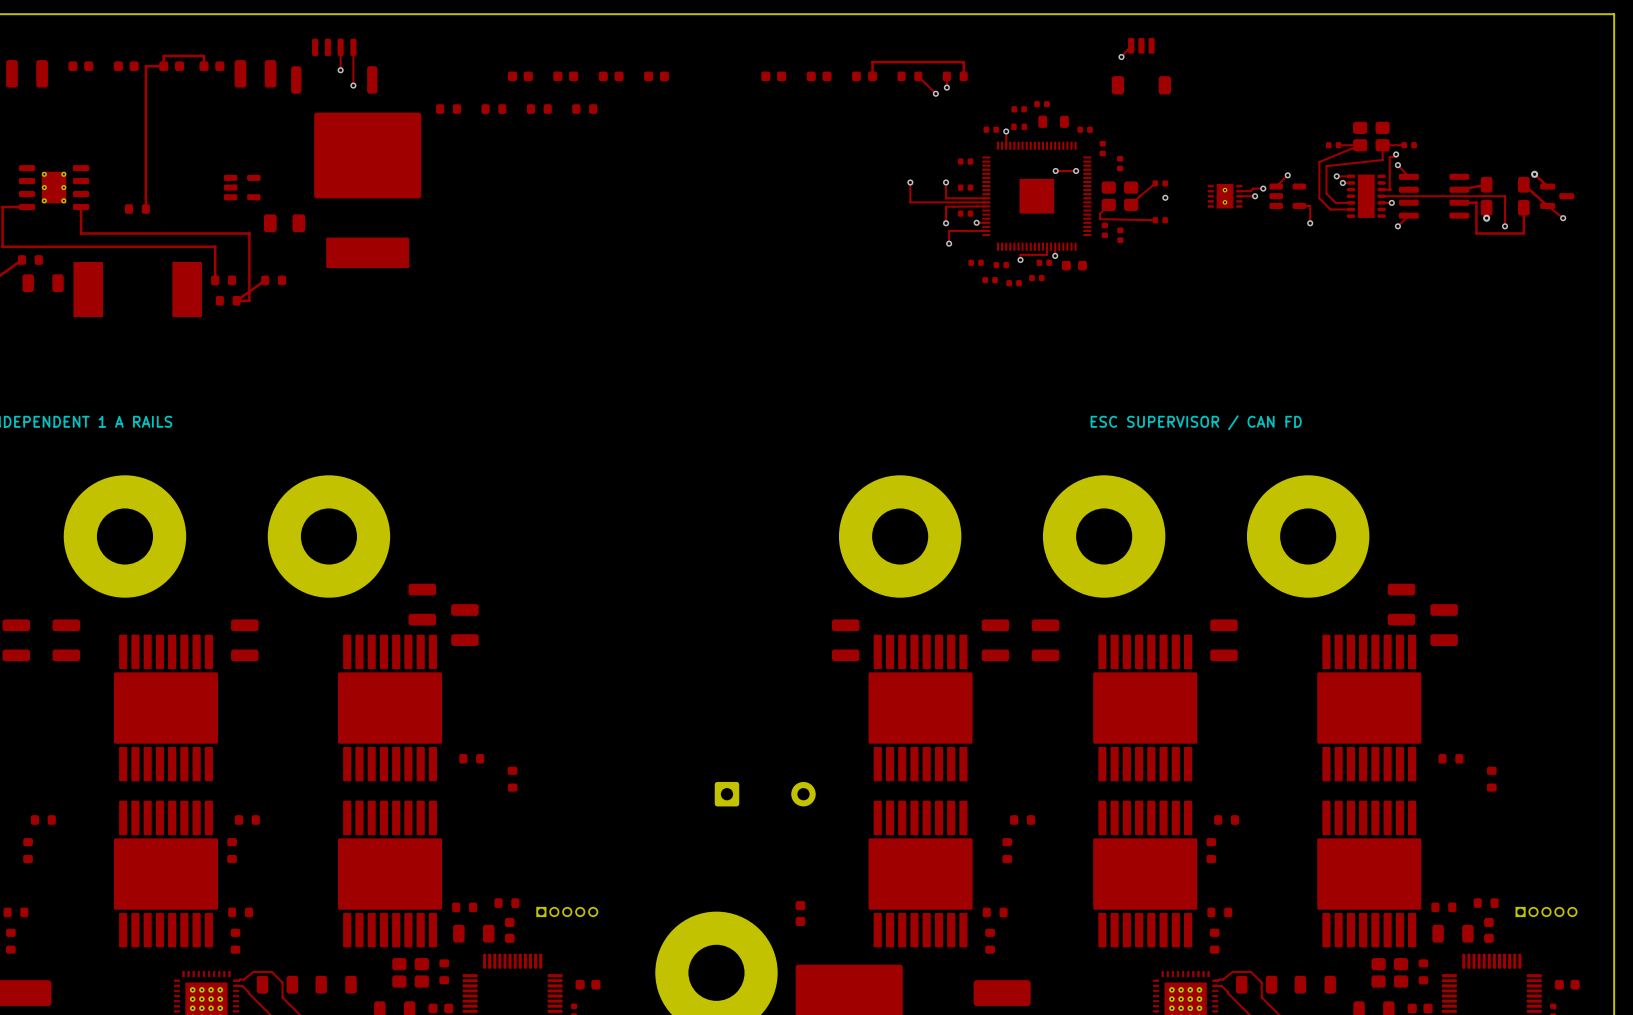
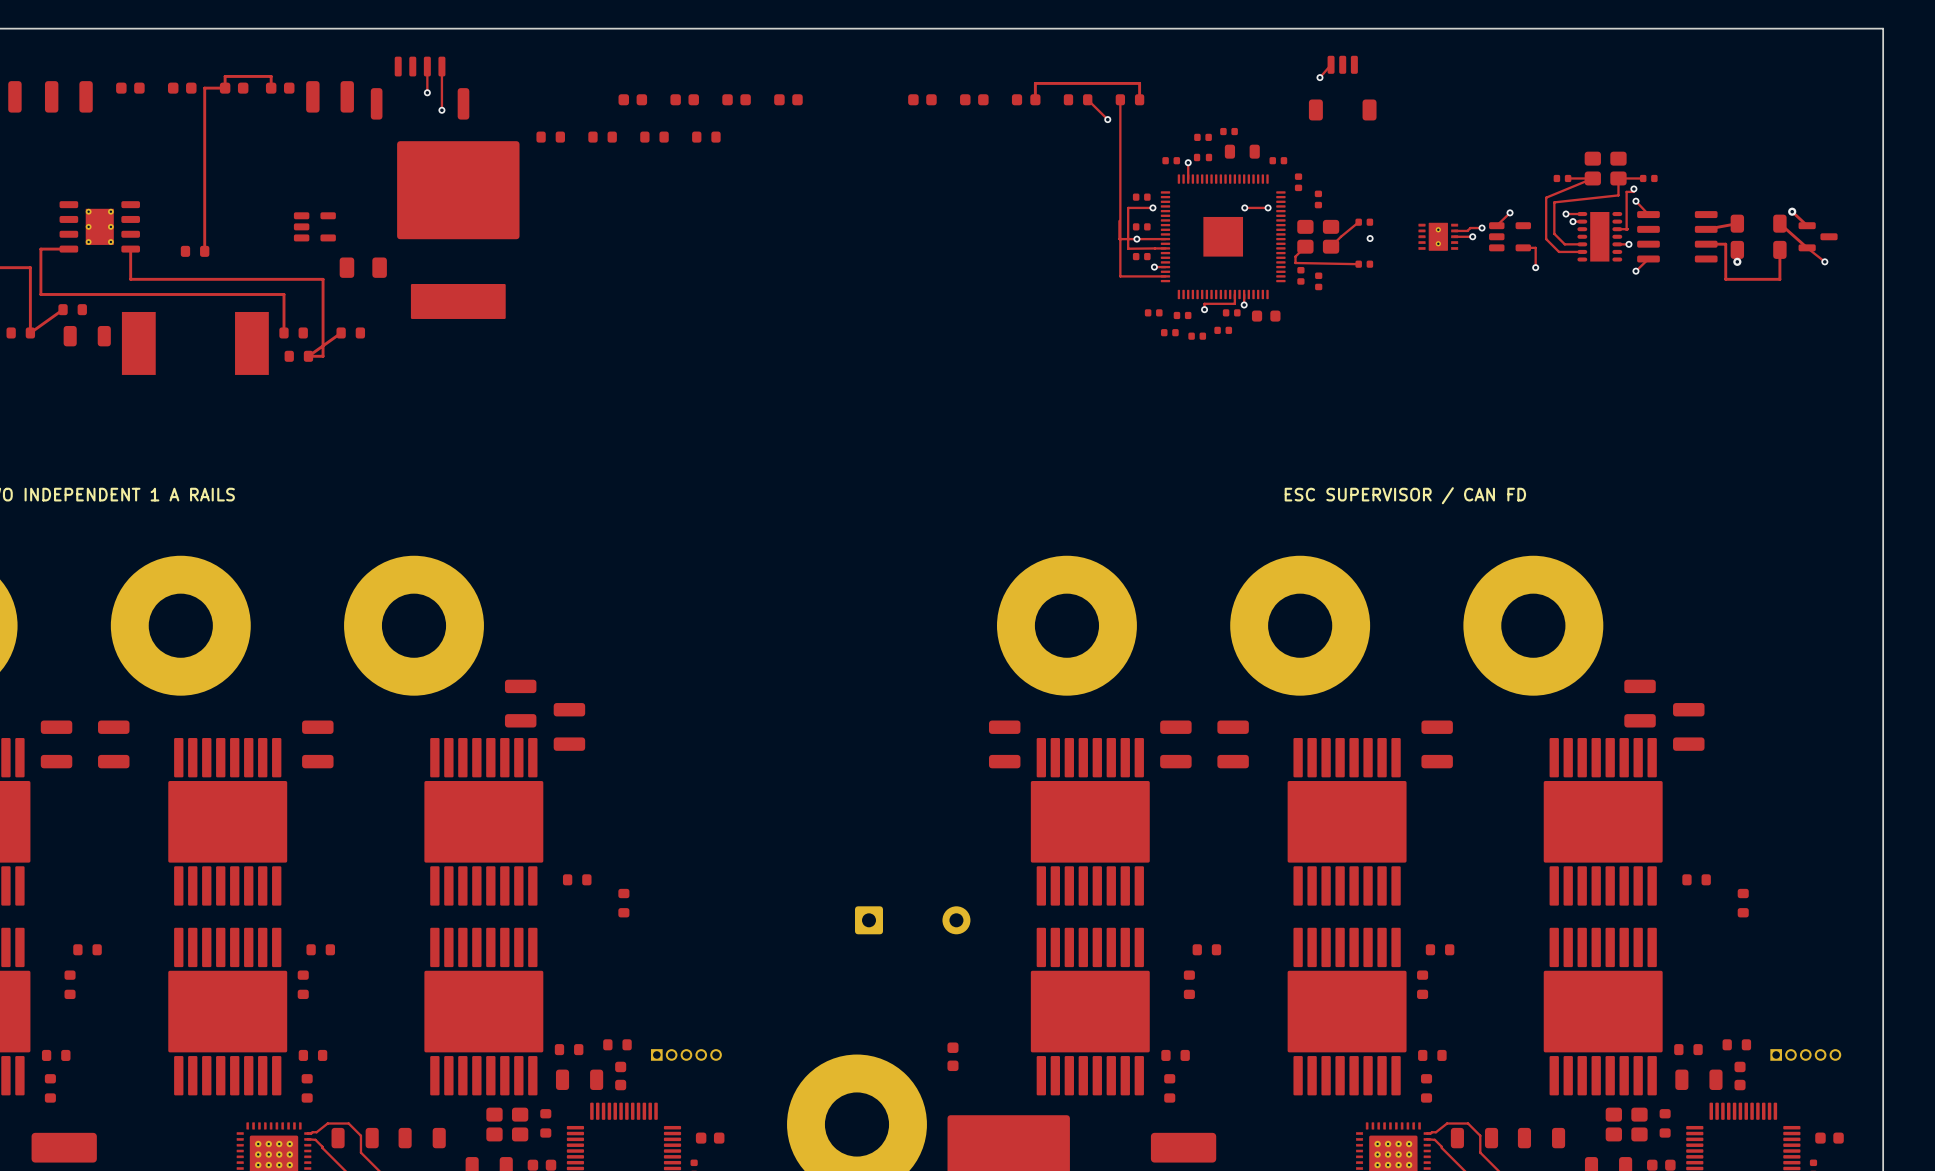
via: (946, 87) -> none
via: none -> (1152, 207)
track: (910, 182) (910, 202) (986, 202) -> none
via: (910, 182) -> none
via: (946, 182) -> none
track: (1381, 196) (1505, 196) (1505, 226) -> none
via: none -> (1136, 239)
track: (953, 206) (946, 206) (946, 223) -> (1128, 248) (1128, 207) (1152, 207)
via: (946, 223) -> none
via: (1505, 226) -> none
track: (949, 230) (949, 243) -> (1122, 276) (1120, 276) (1120, 112)
via: (949, 243) -> none

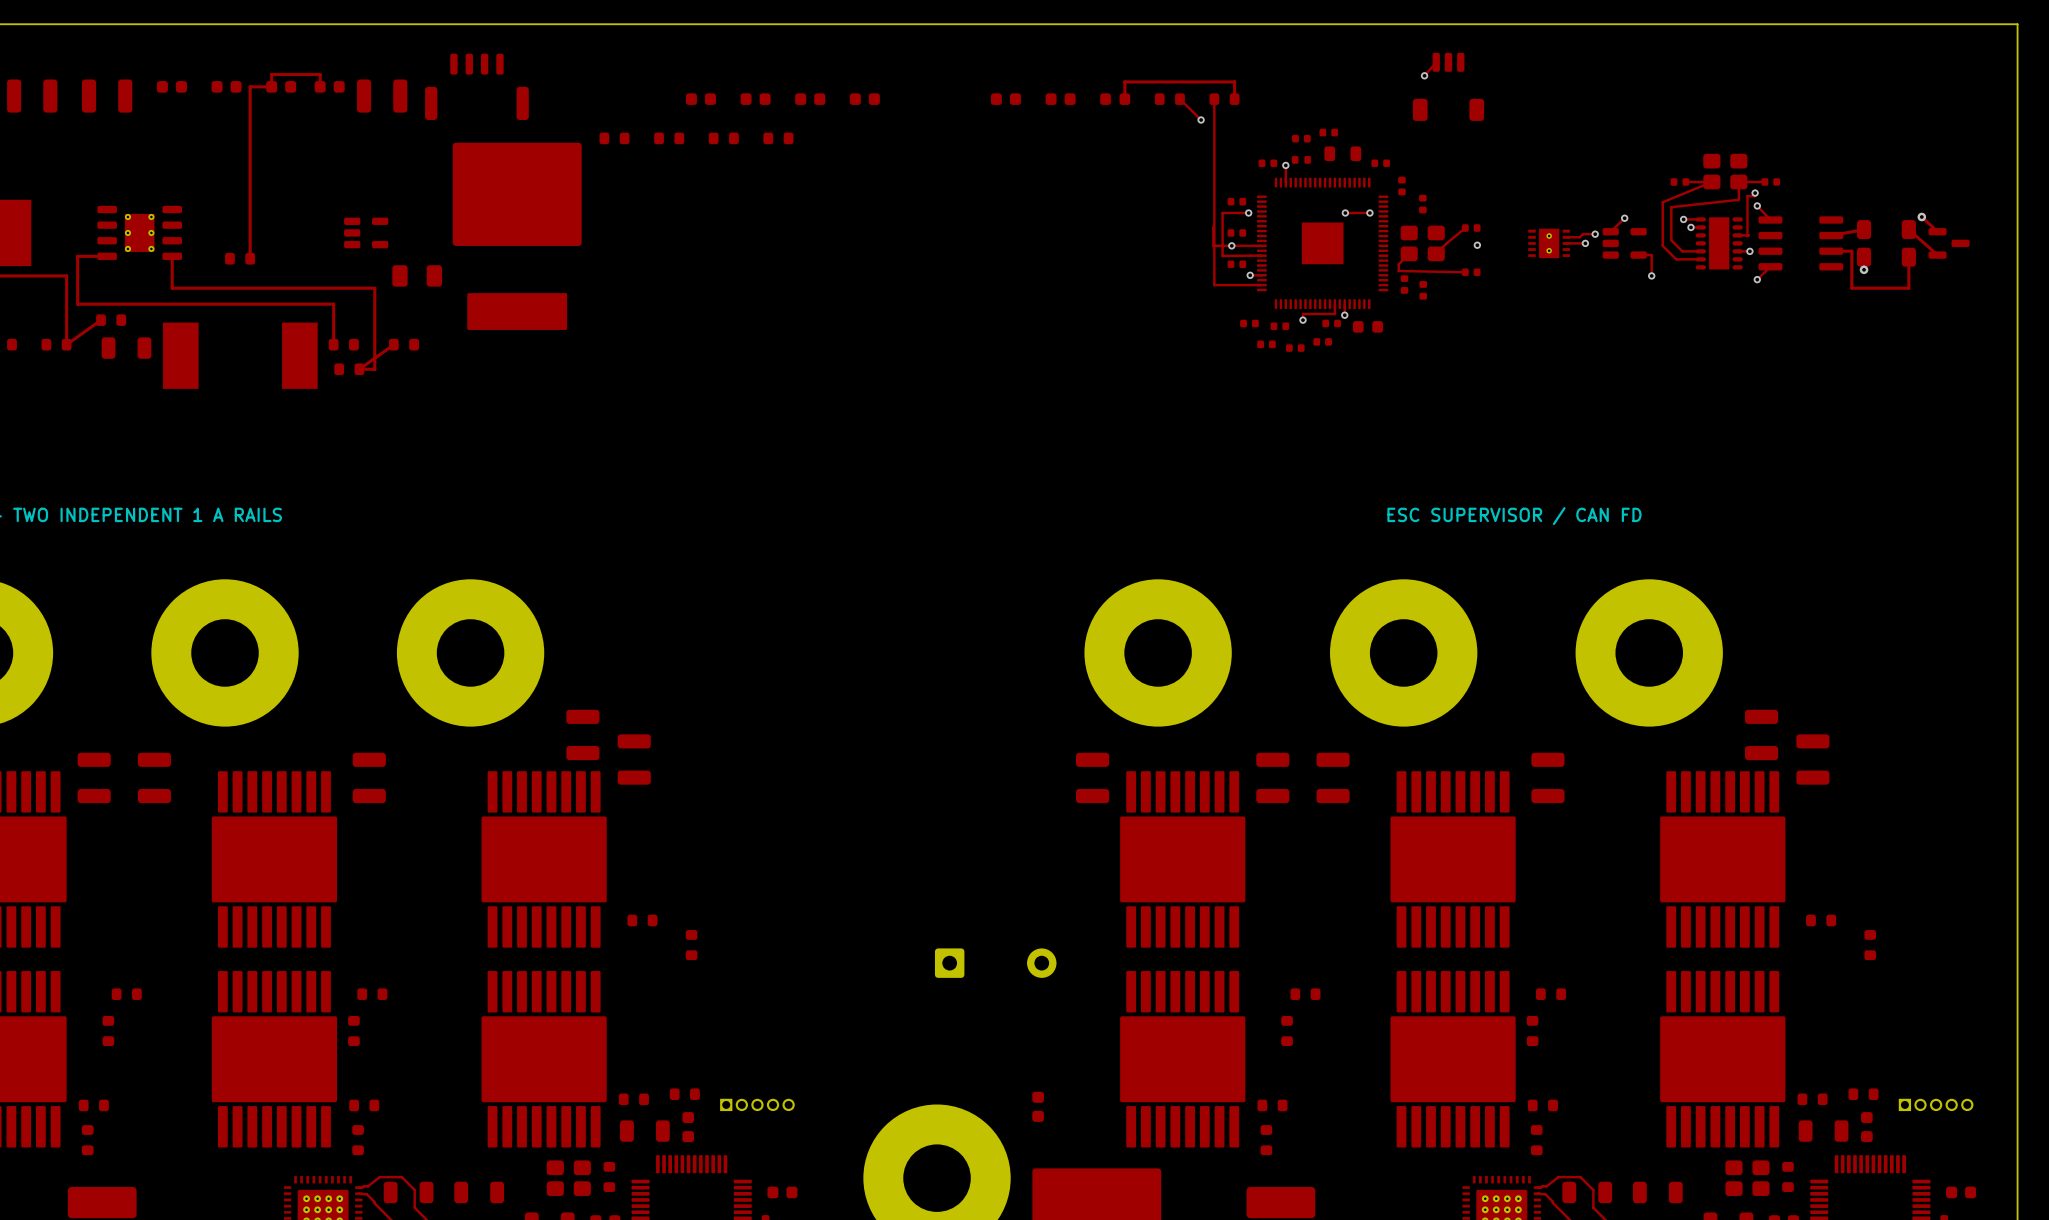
track: (427, 66) (427, 92) -> none
track: (441, 66) (441, 110) -> none
via: (427, 92) -> none
via: (441, 110) -> none
track: (1807, 247) (1824, 261) -> none
via: (1824, 261) -> none

